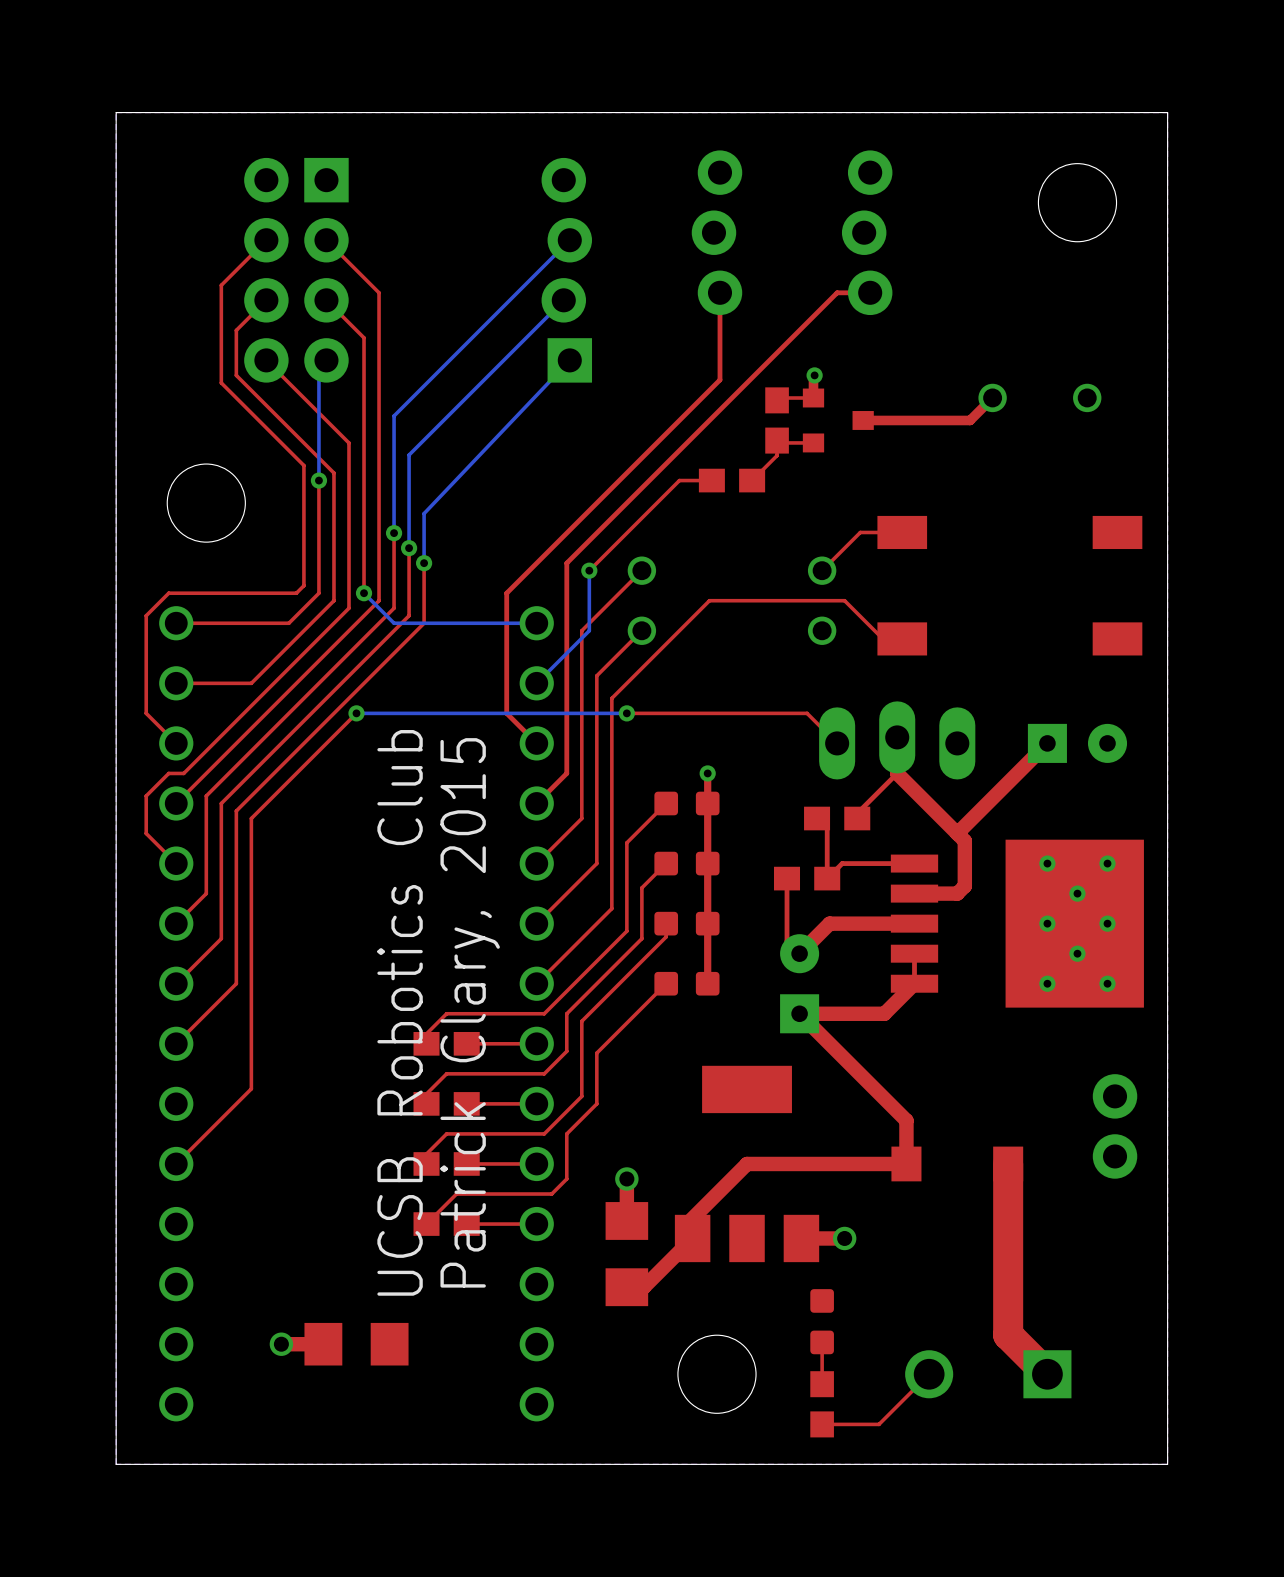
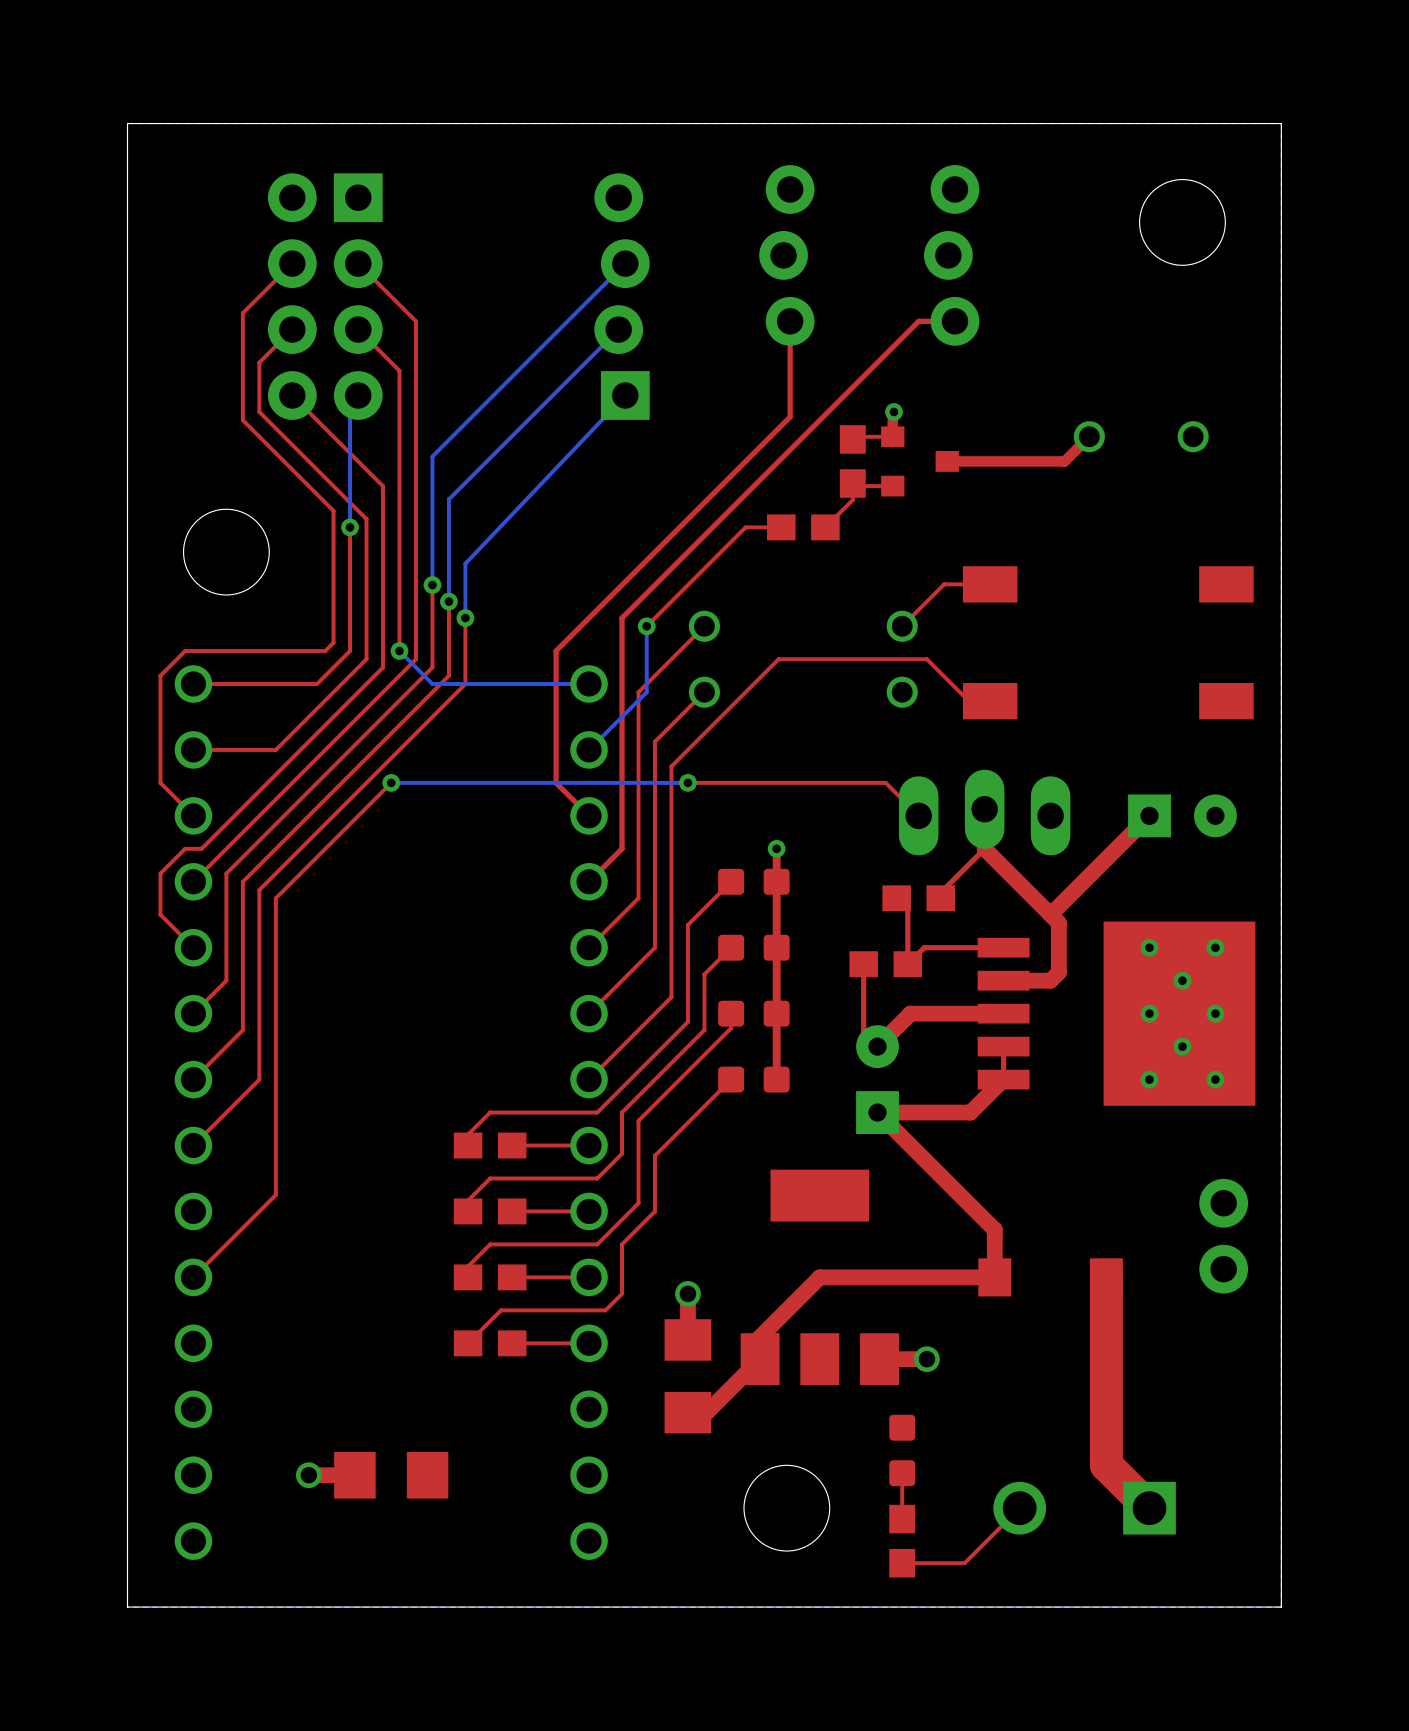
text: UCSB Robotics Club (400, 1012) -> none
text: Patrick Clary, 2015 (470, 1012) -> none

